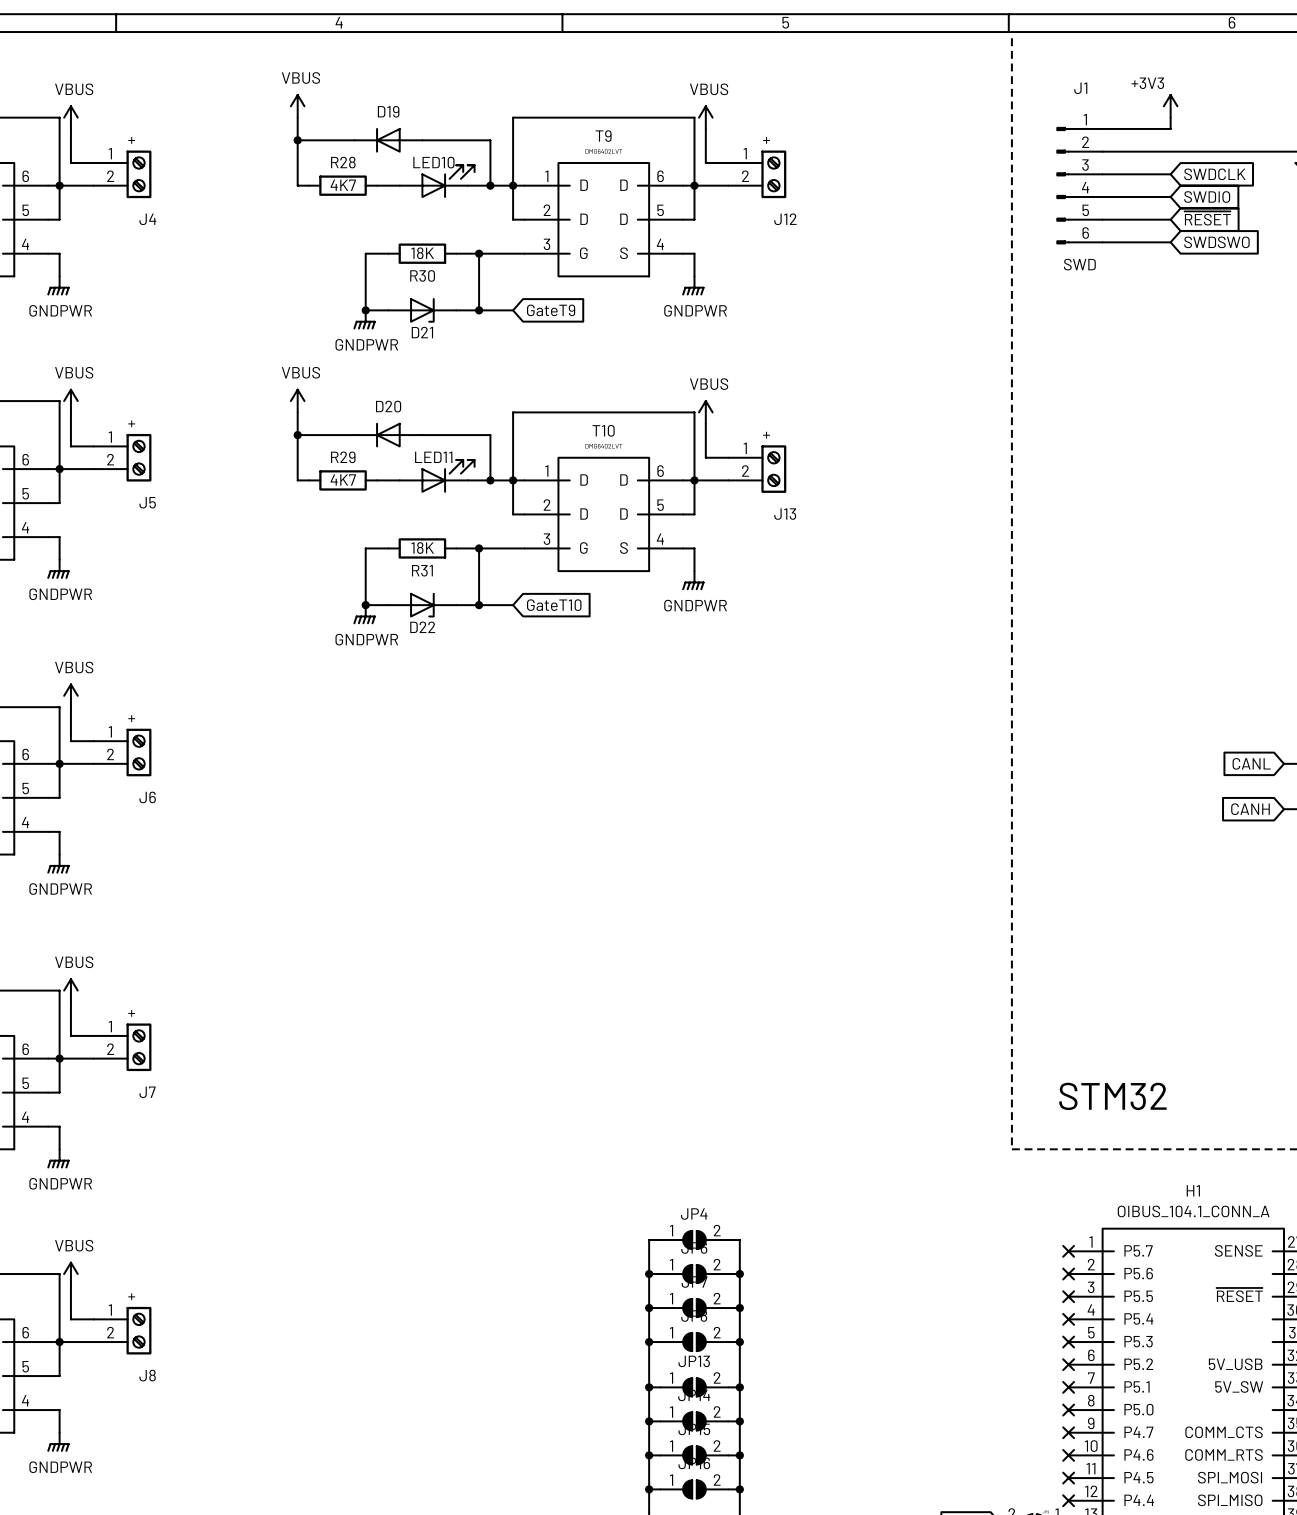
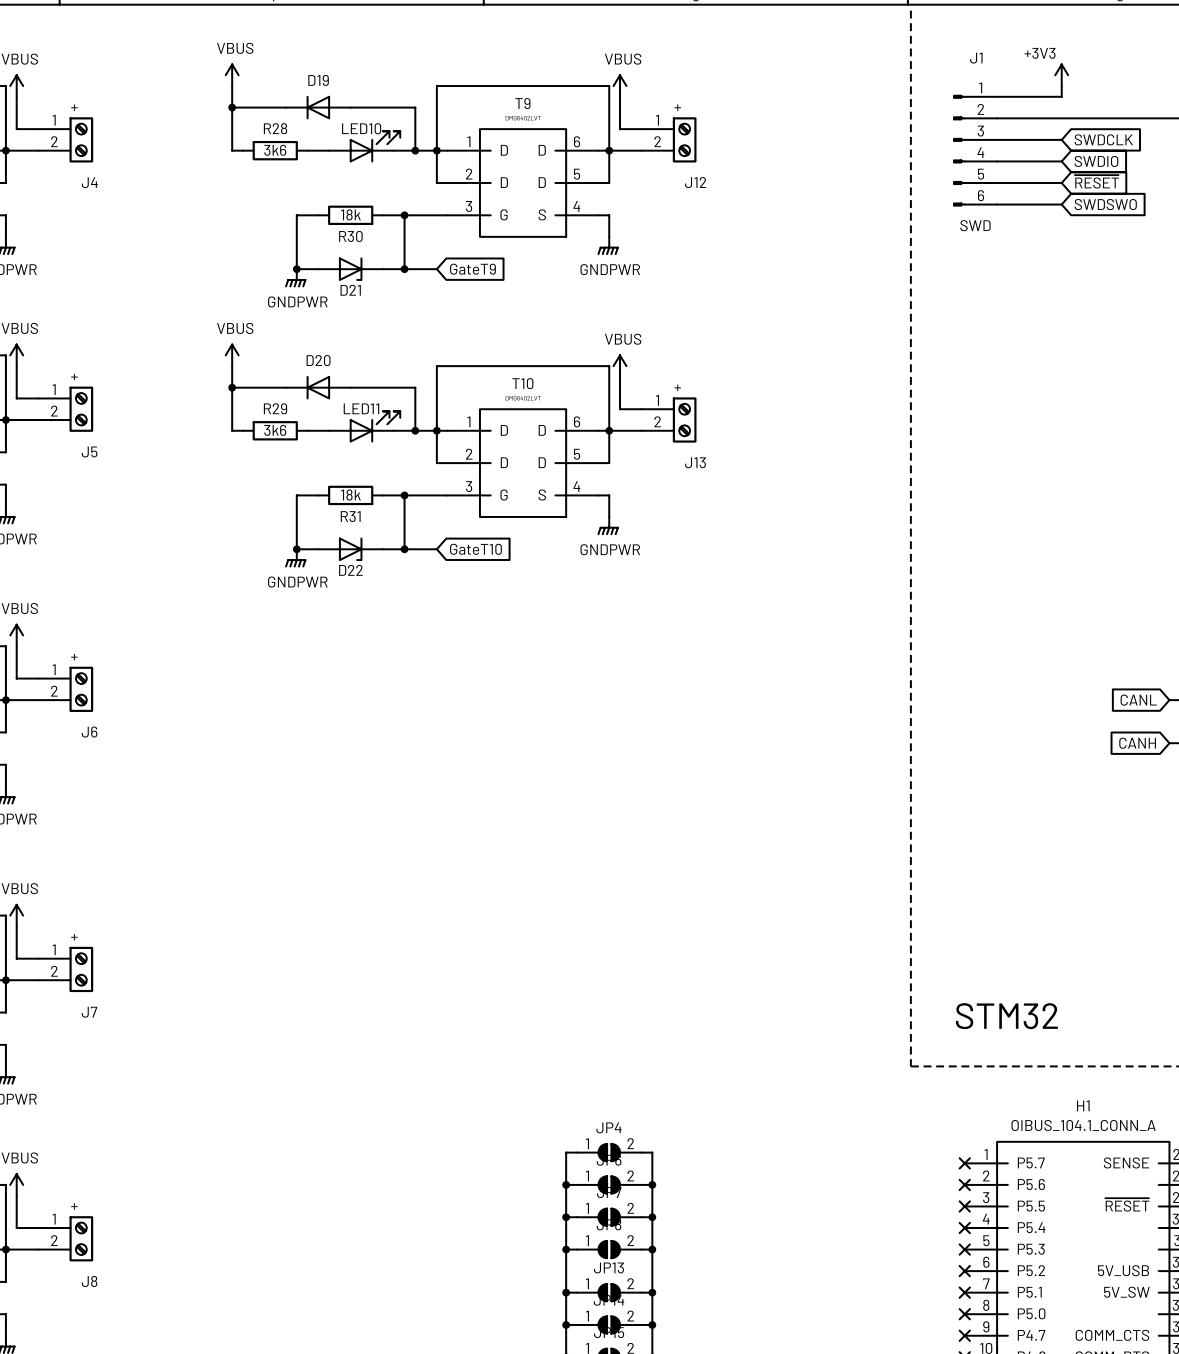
R28 value: 4K7 (343, 185) -> 3k6 (275, 150)
R30 value: 18K (422, 253) -> 18k (350, 214)
R29 value: 4K7 (343, 480) -> 3k6 (275, 430)
R31 value: 18K (422, 548) -> 18k (350, 495)

